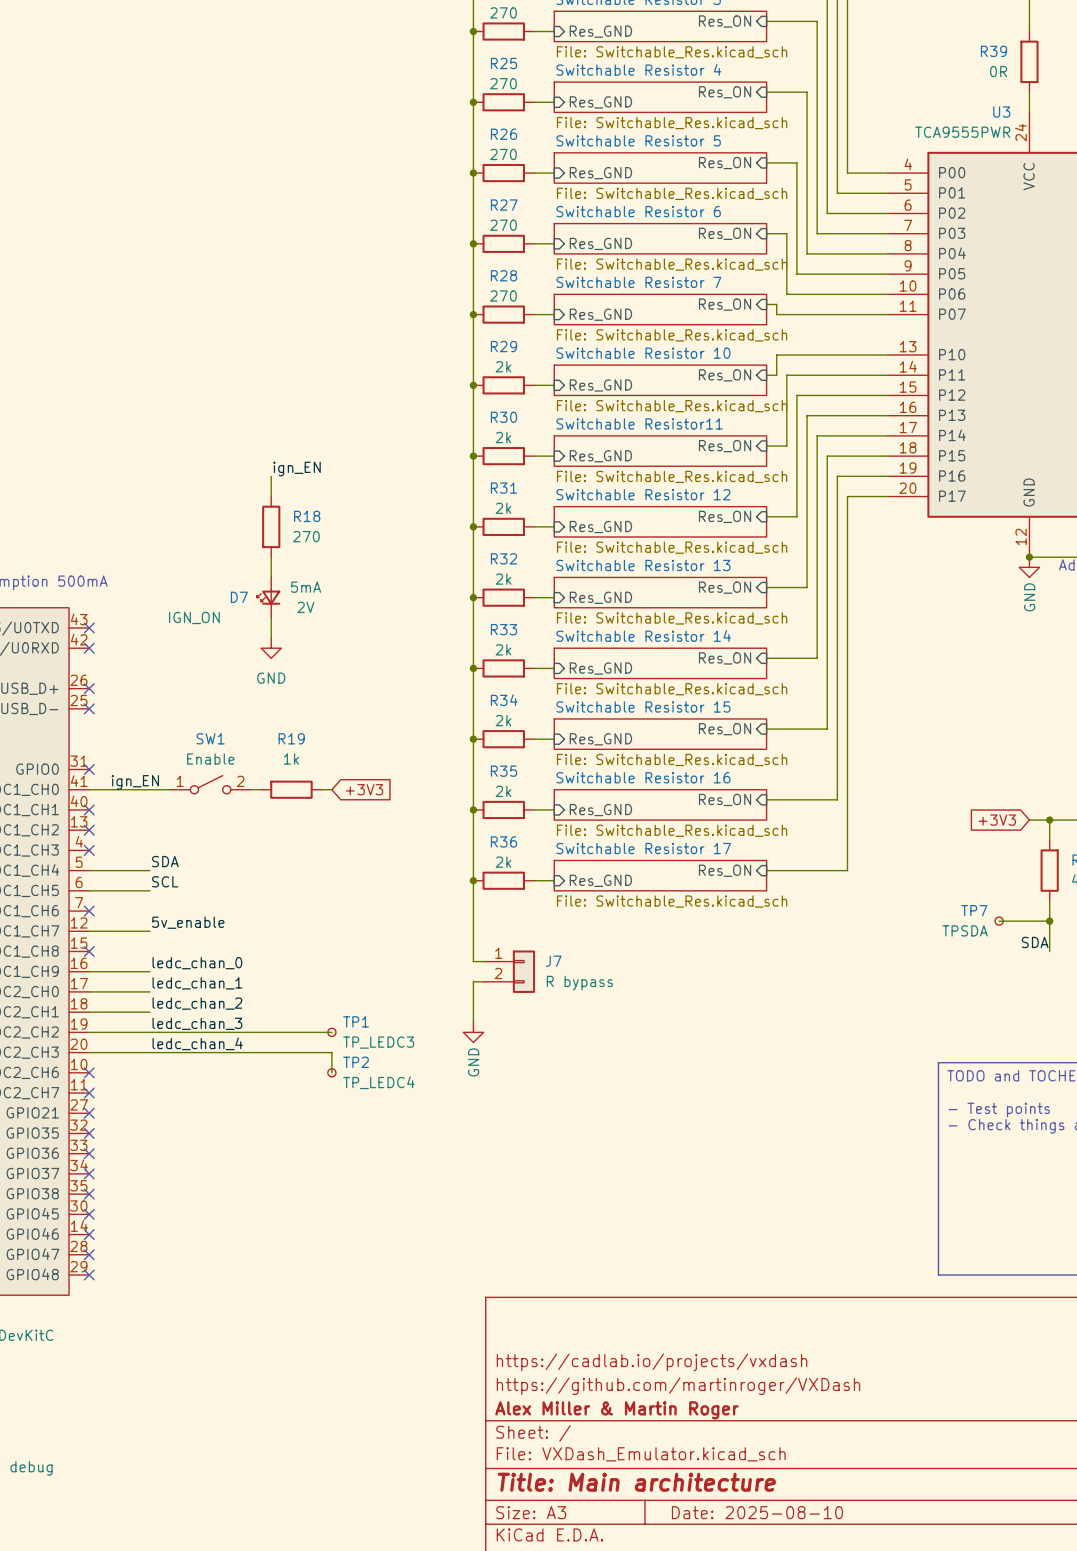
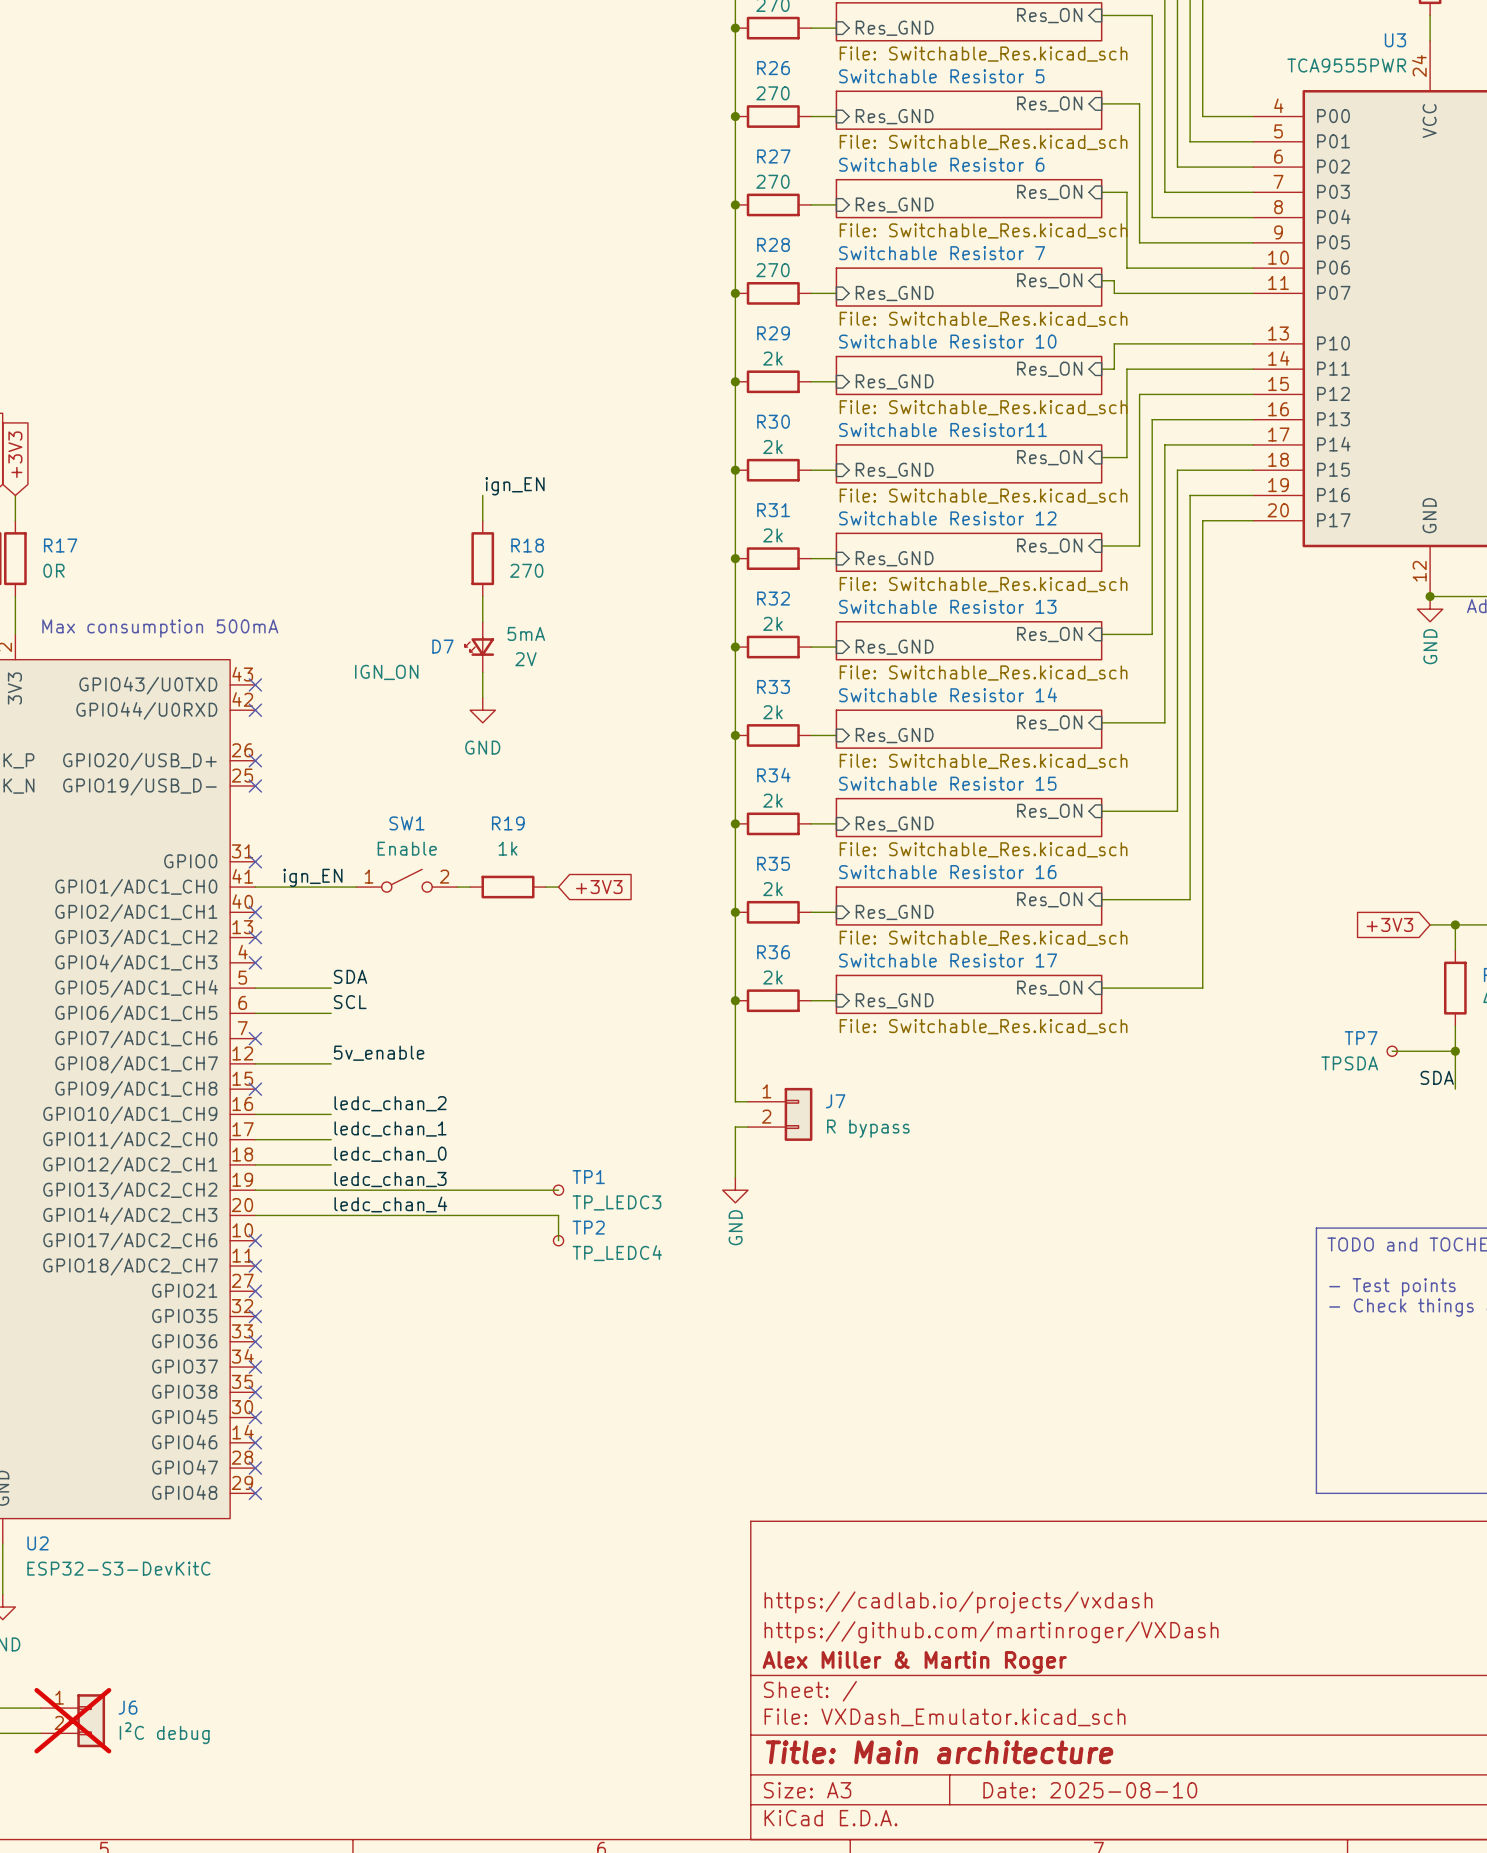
label: ledc_chan_0 (197, 963) -> ledc_chan_2 (390, 1103)
label: ledc_chan_2 (197, 1003) -> ledc_chan_0 (390, 1154)

